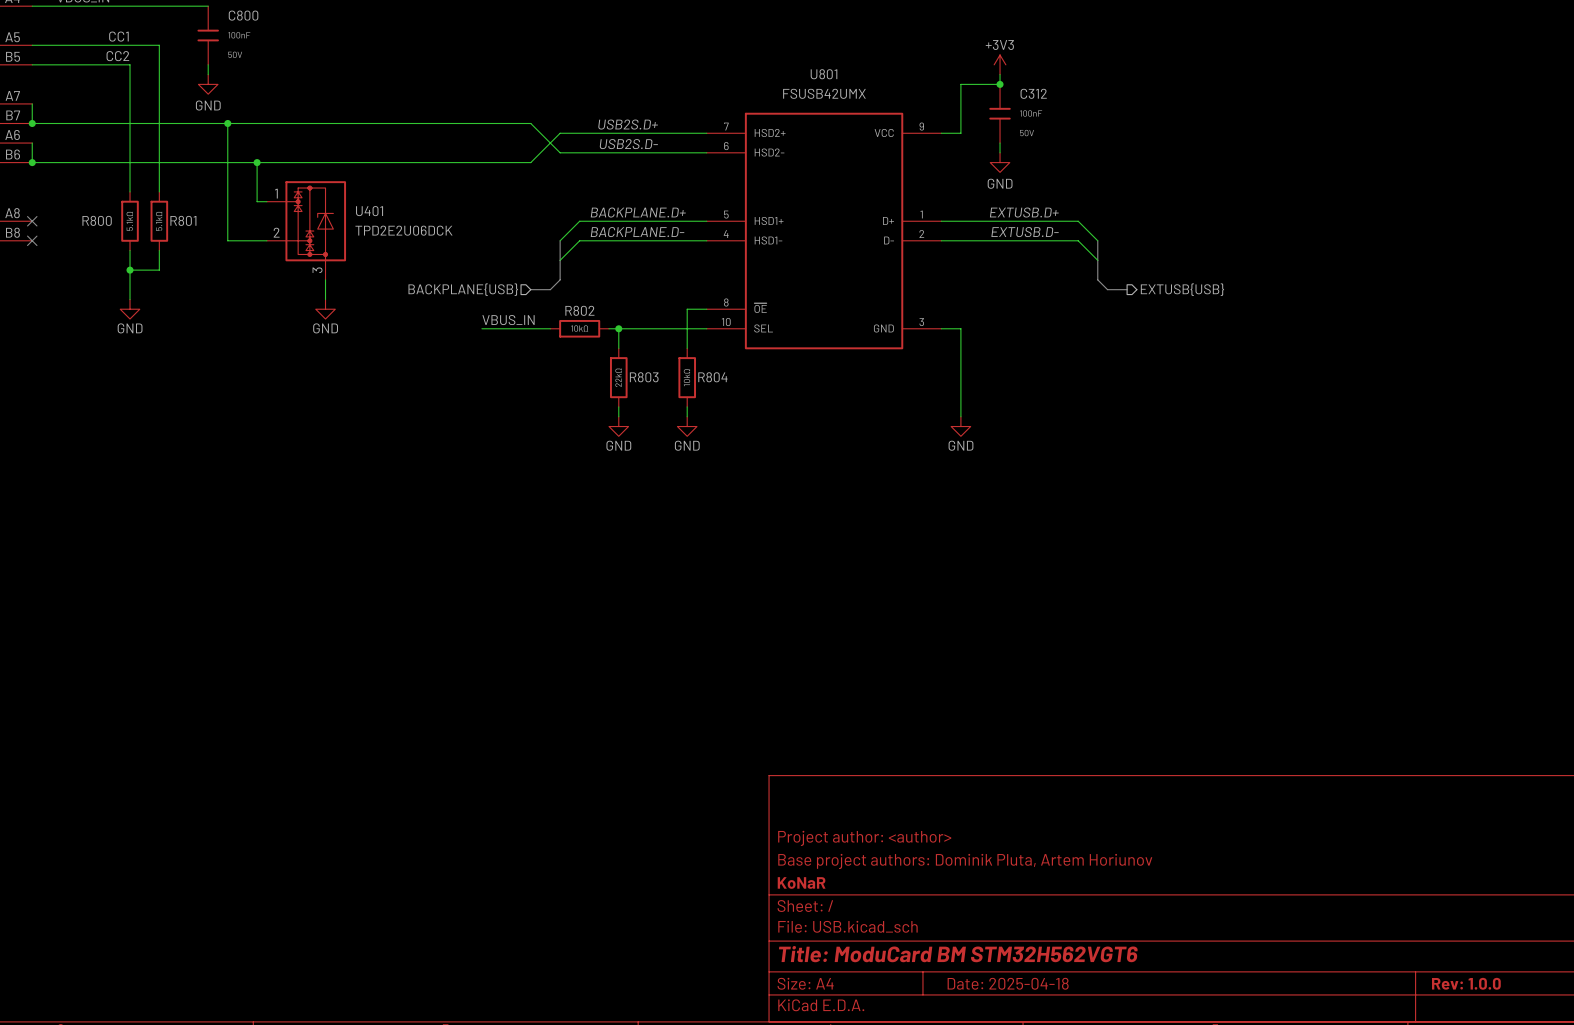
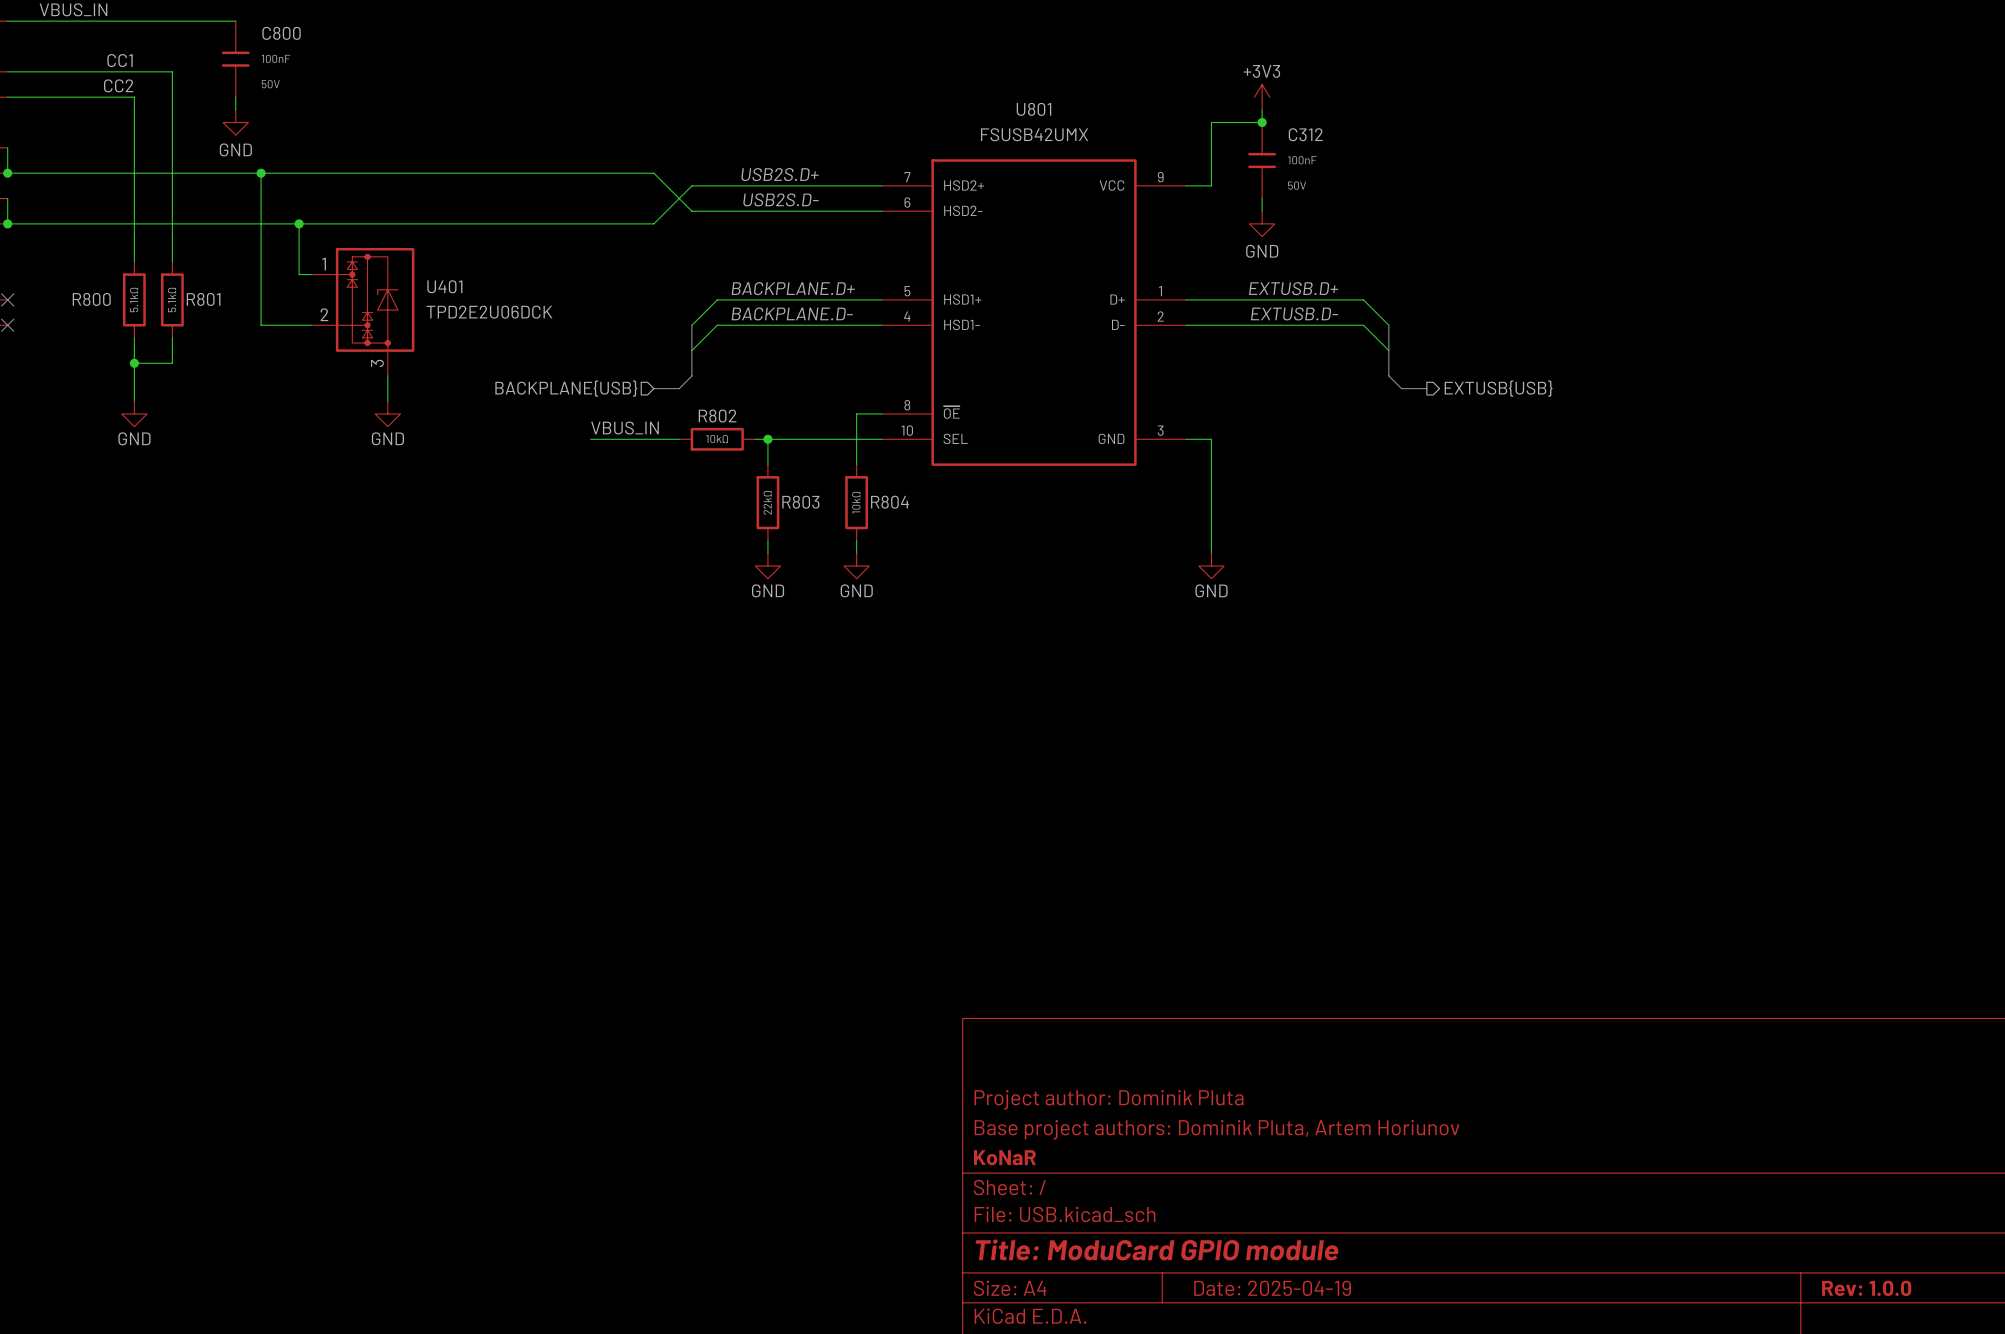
title block: Project author: <author> (864, 838) -> Project author: Dominik Pluta (1109, 1099)
title block: Title: ModuCard BM STM32H562VGT6 (958, 954) -> Title: ModuCard GPIO module (1156, 1249)
title block: Date: 2025-04-18 (1008, 983) -> Date: 2025-04-19 (1272, 1288)

